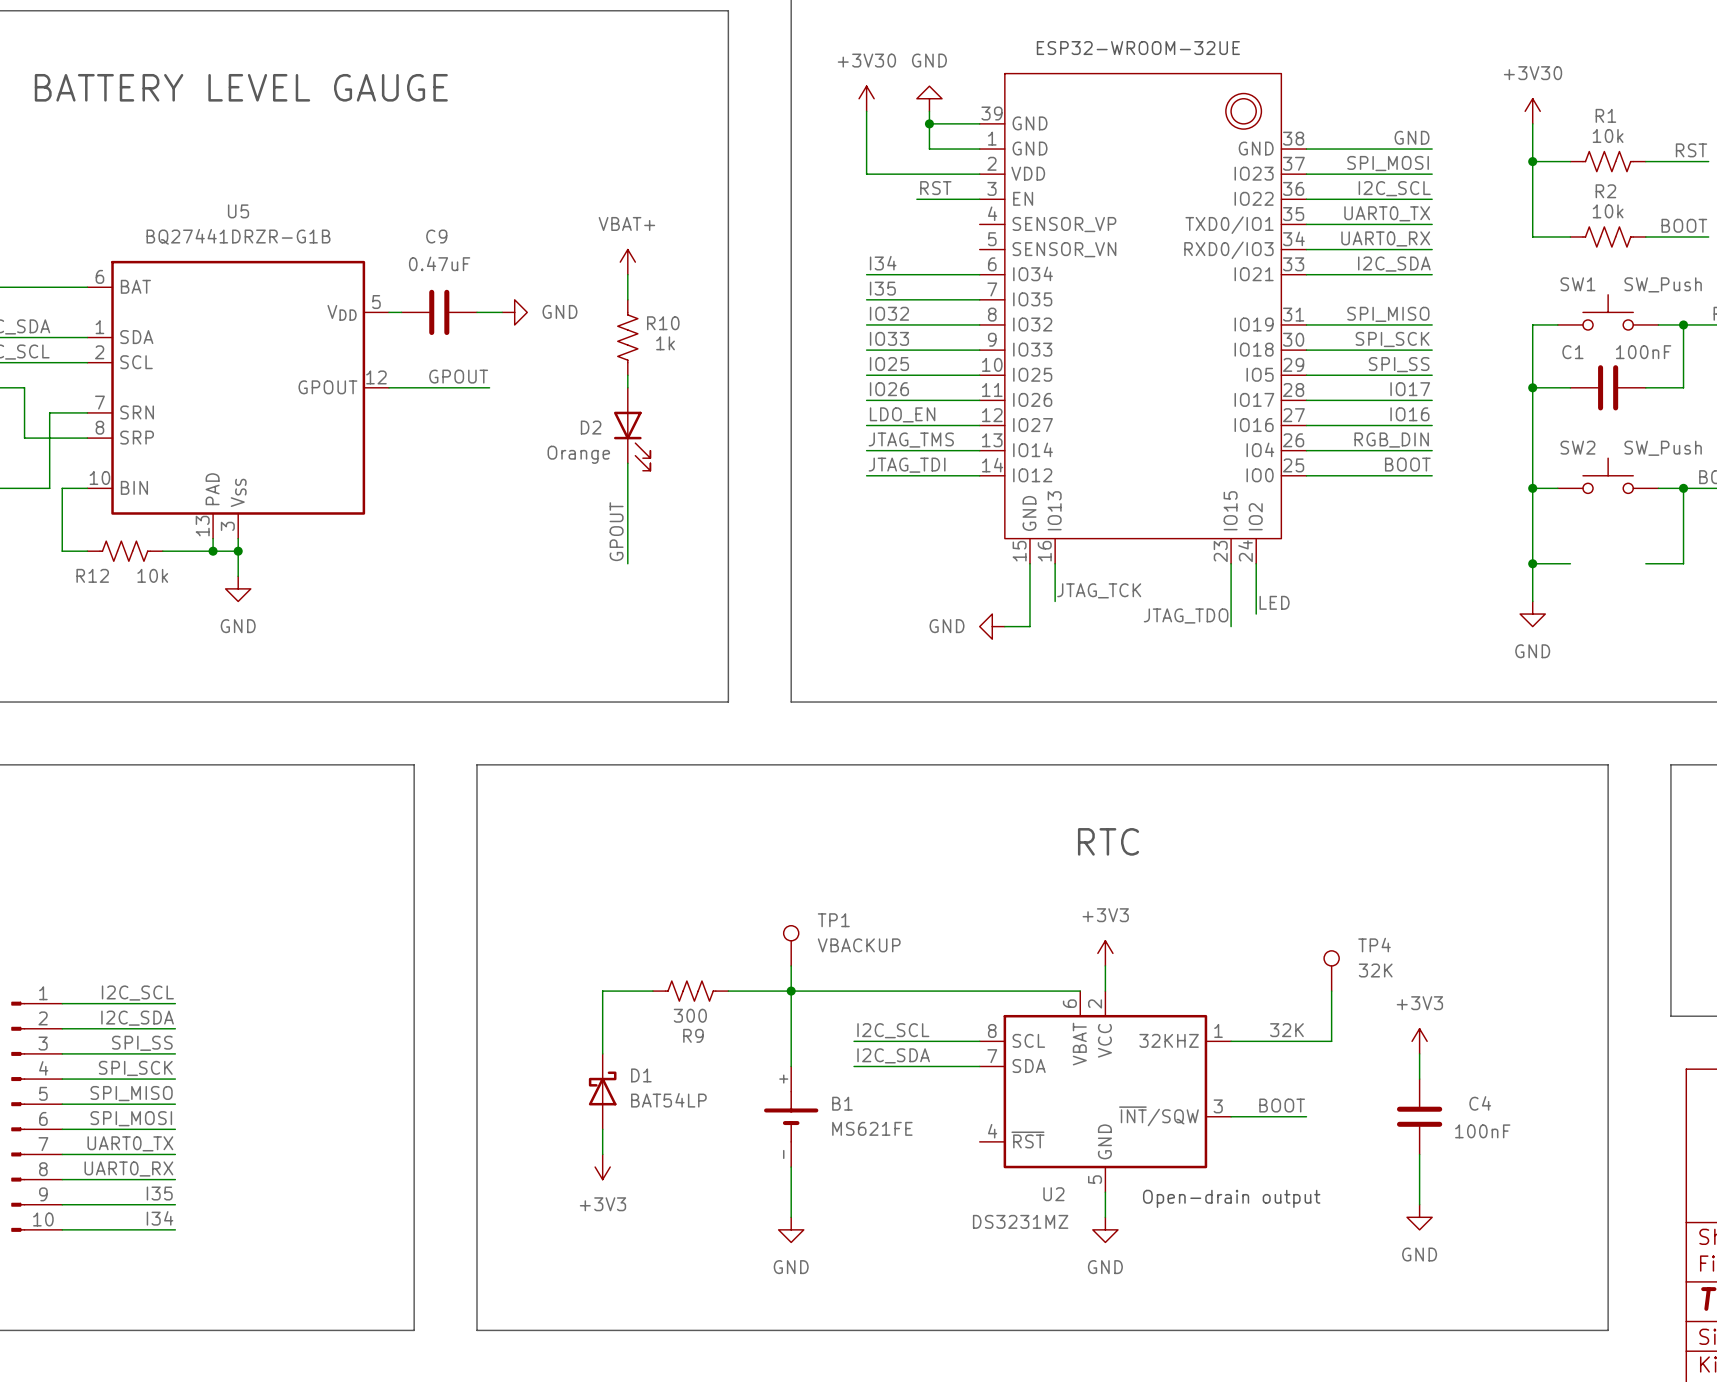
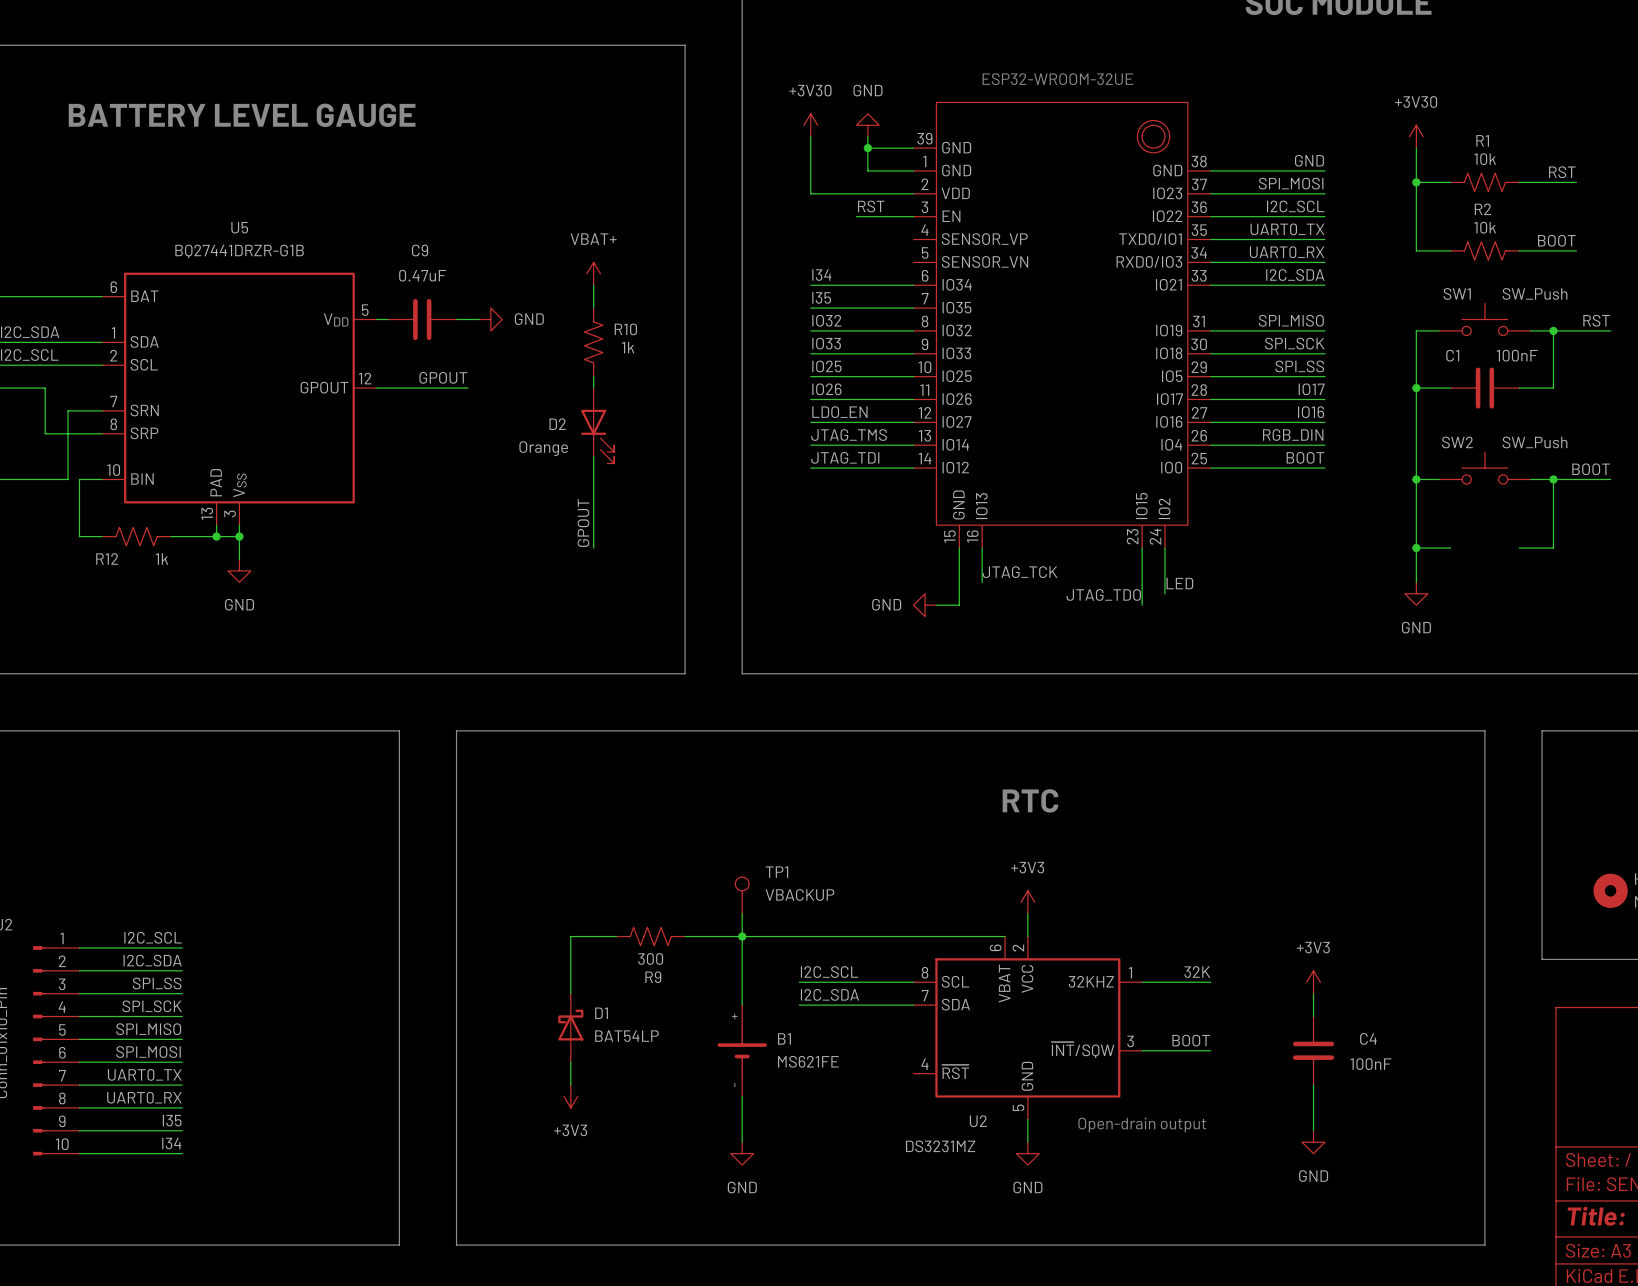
R12 value: 10k (152, 575) -> 1k (161, 559)
TP4: 32K (1331, 970) -> none
wire: (1331, 991) (1331, 1041) (1306, 1041) -> none

